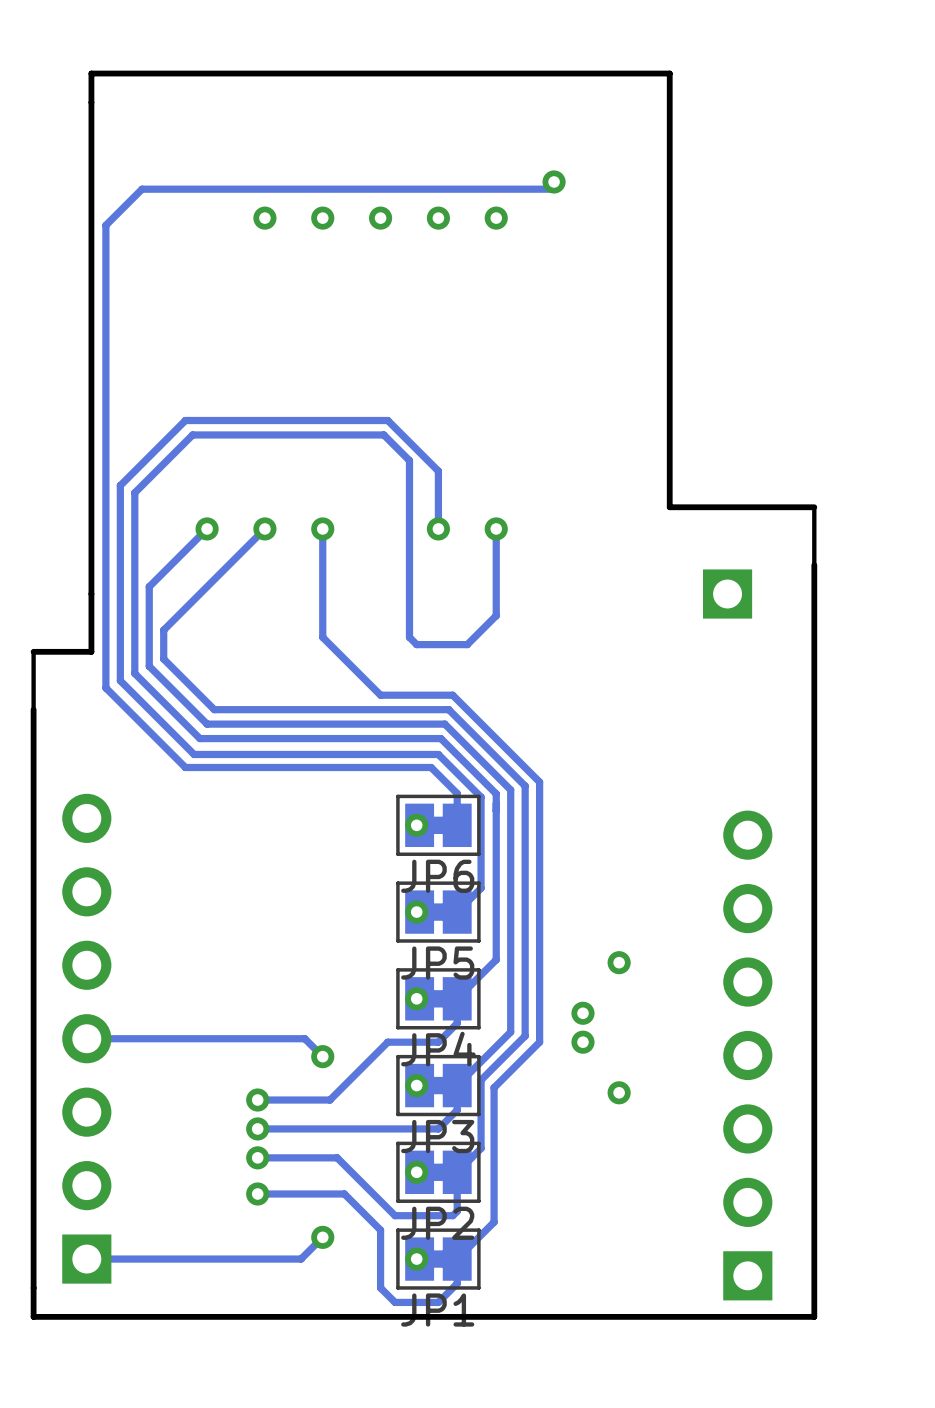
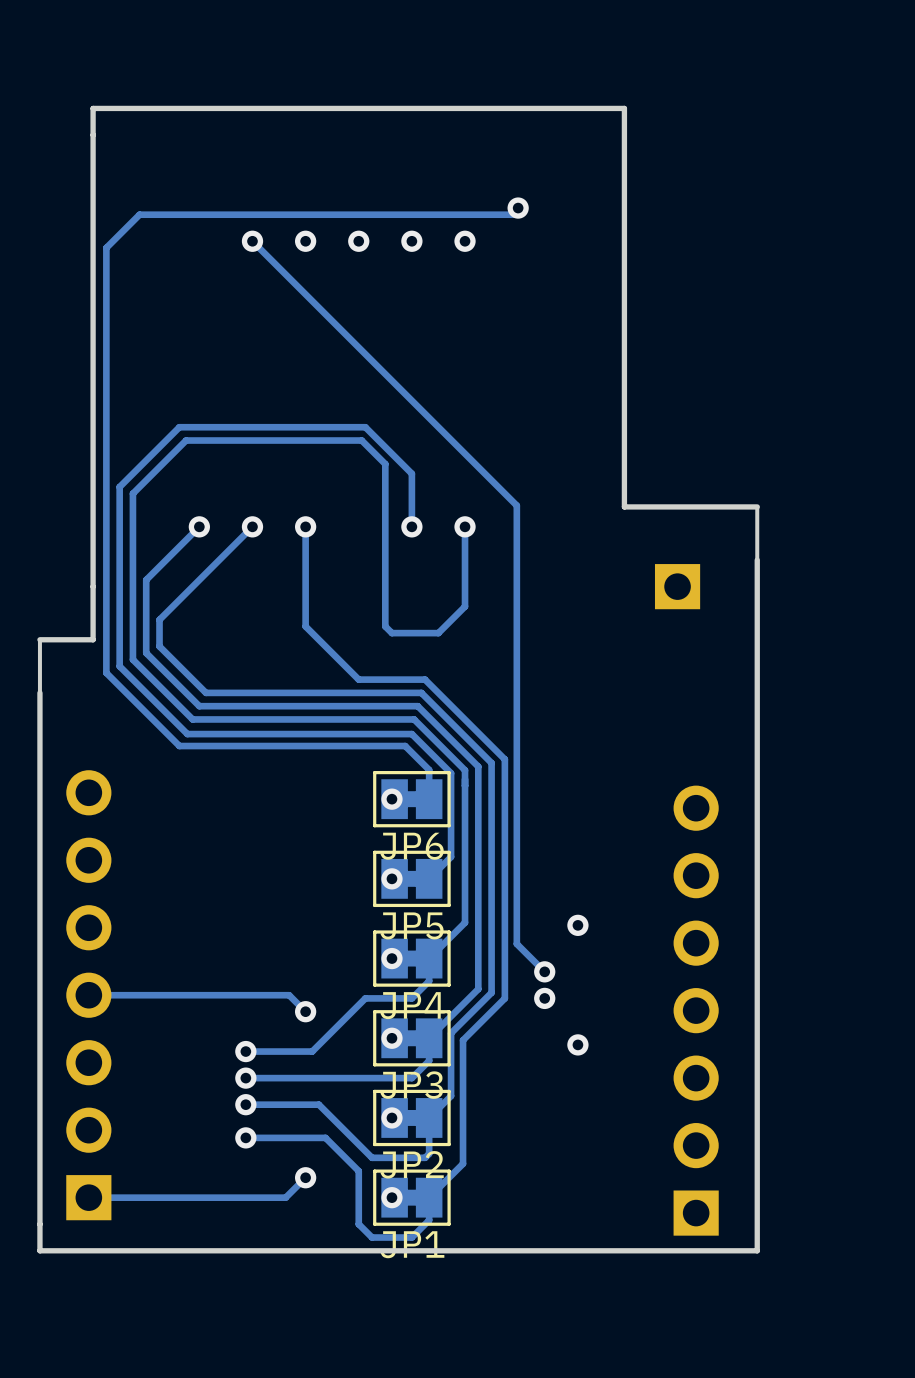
track: none -> (252, 241) (516, 505) (516, 943) (544, 971)

